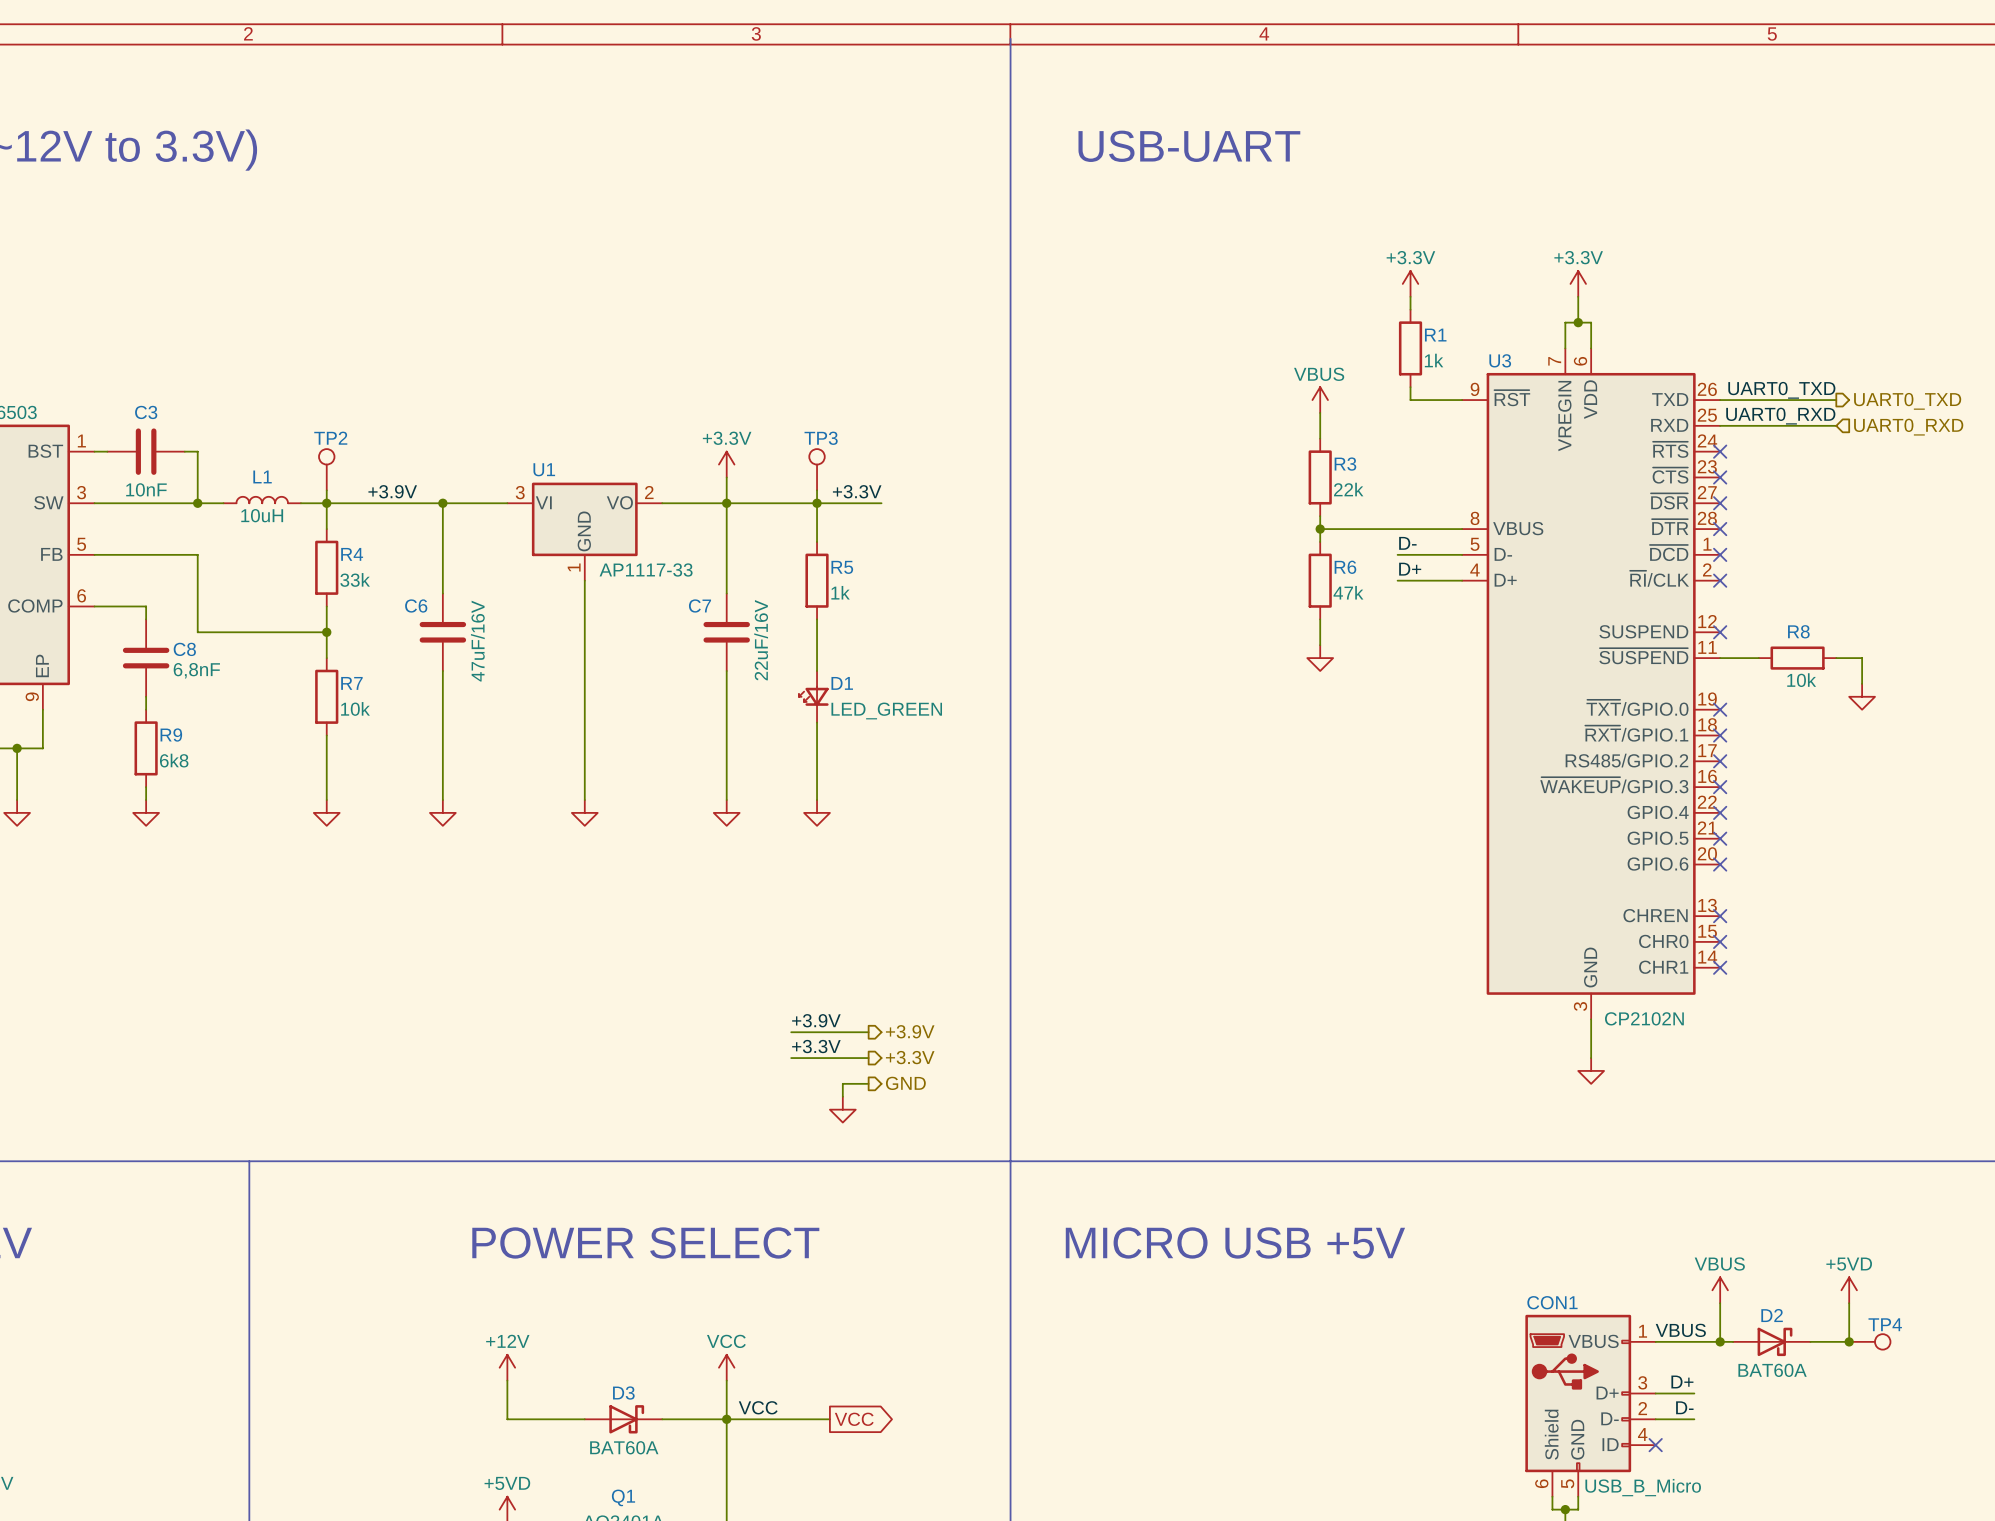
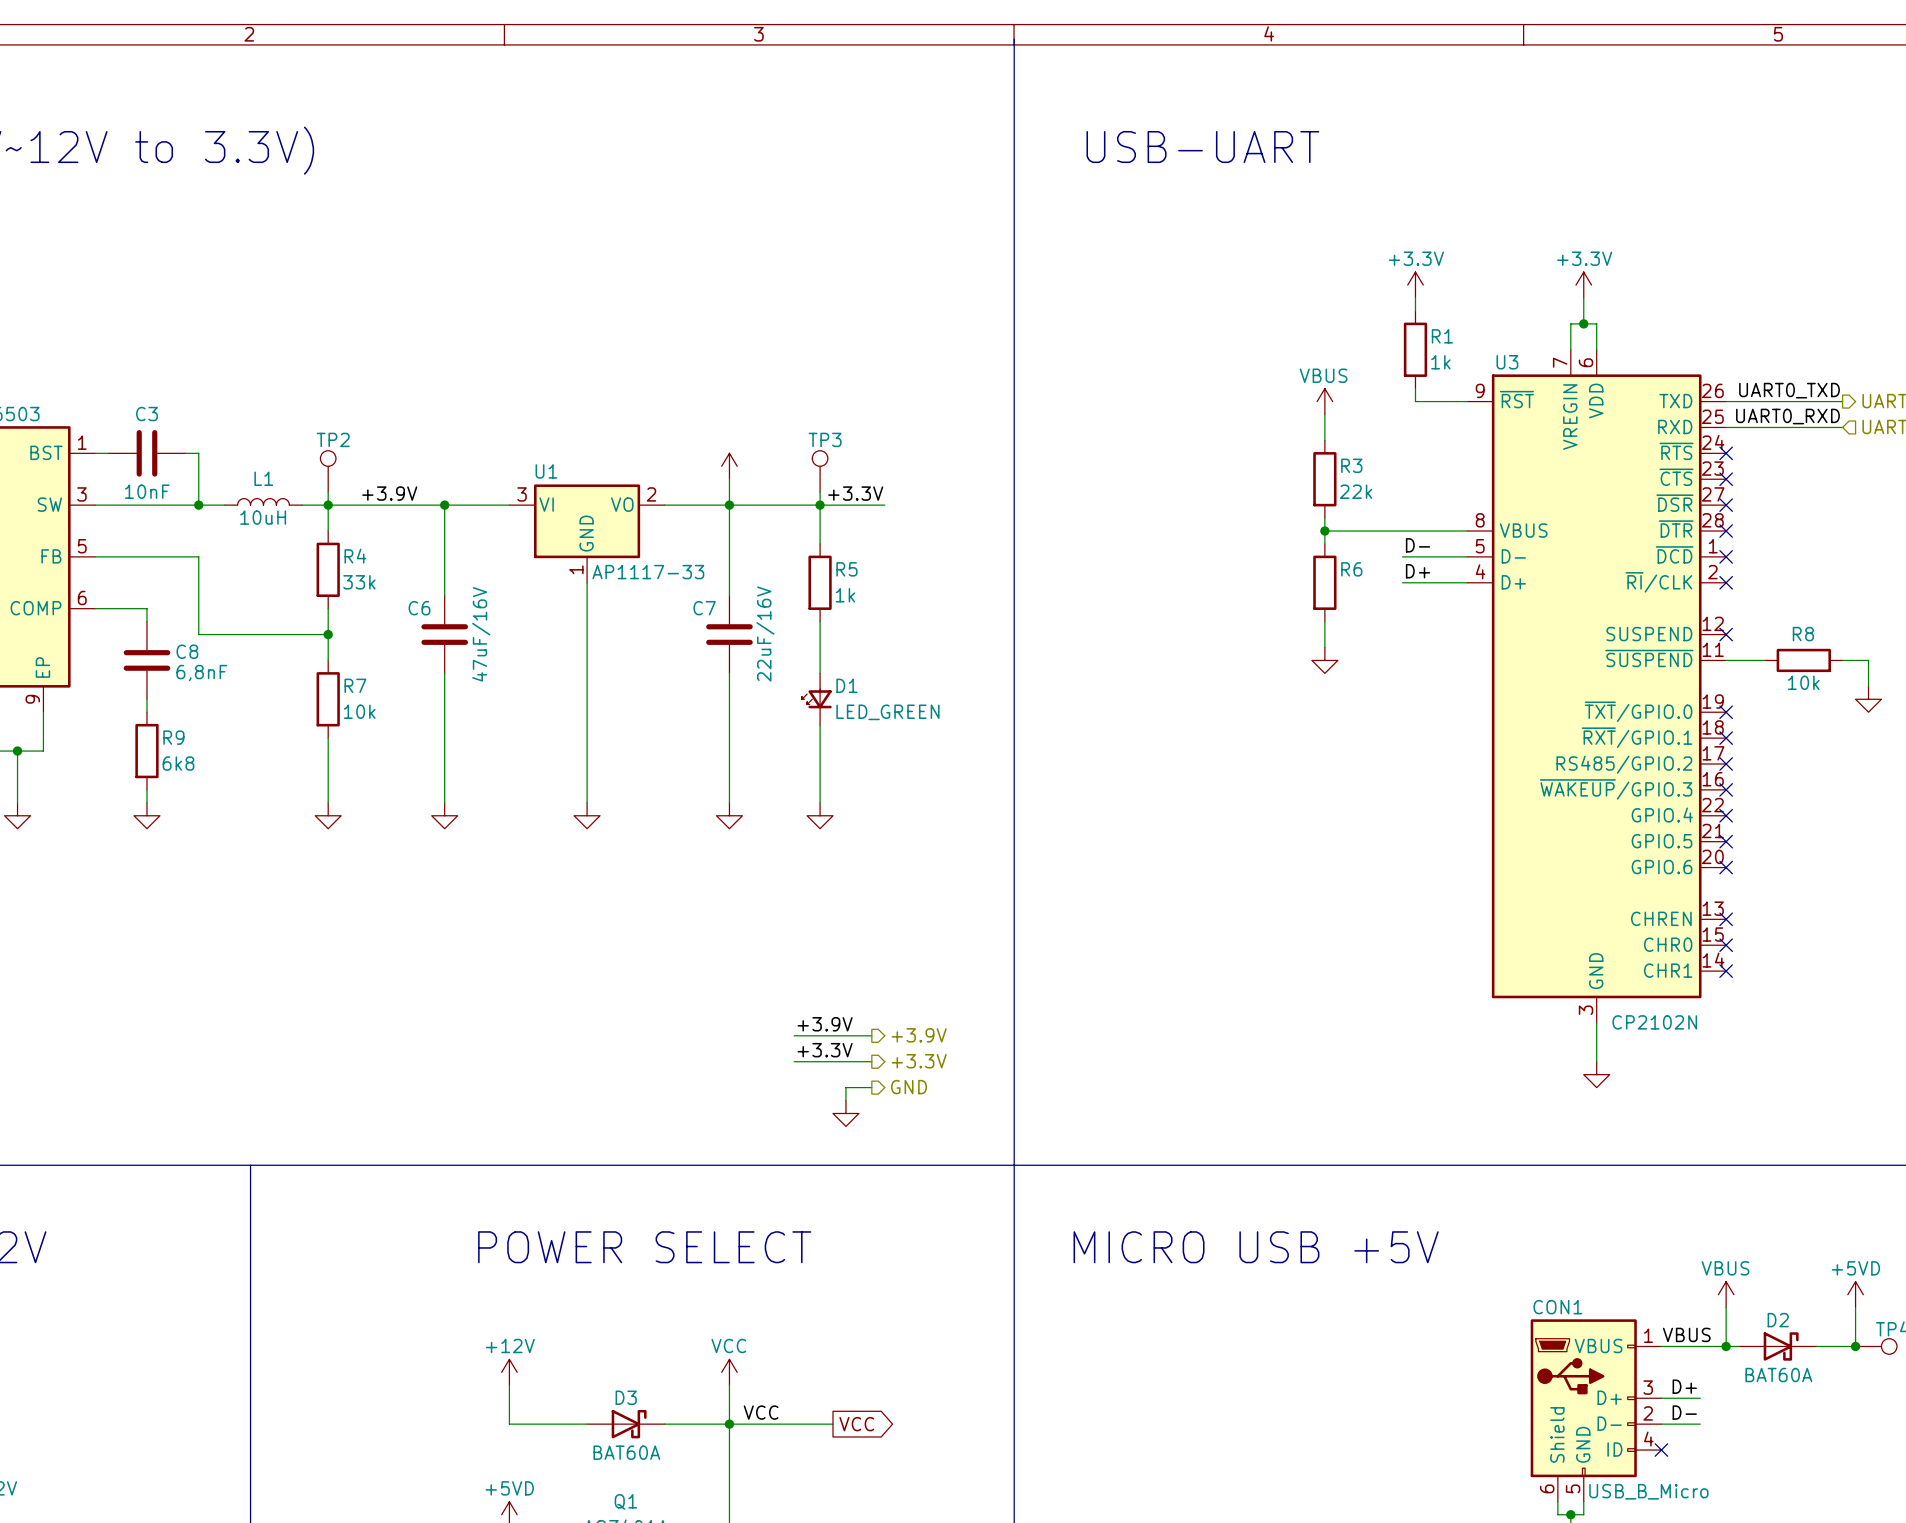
power symbol text: +3.3V (727, 438) -> none
R6 value: 47k (1348, 592) -> none

